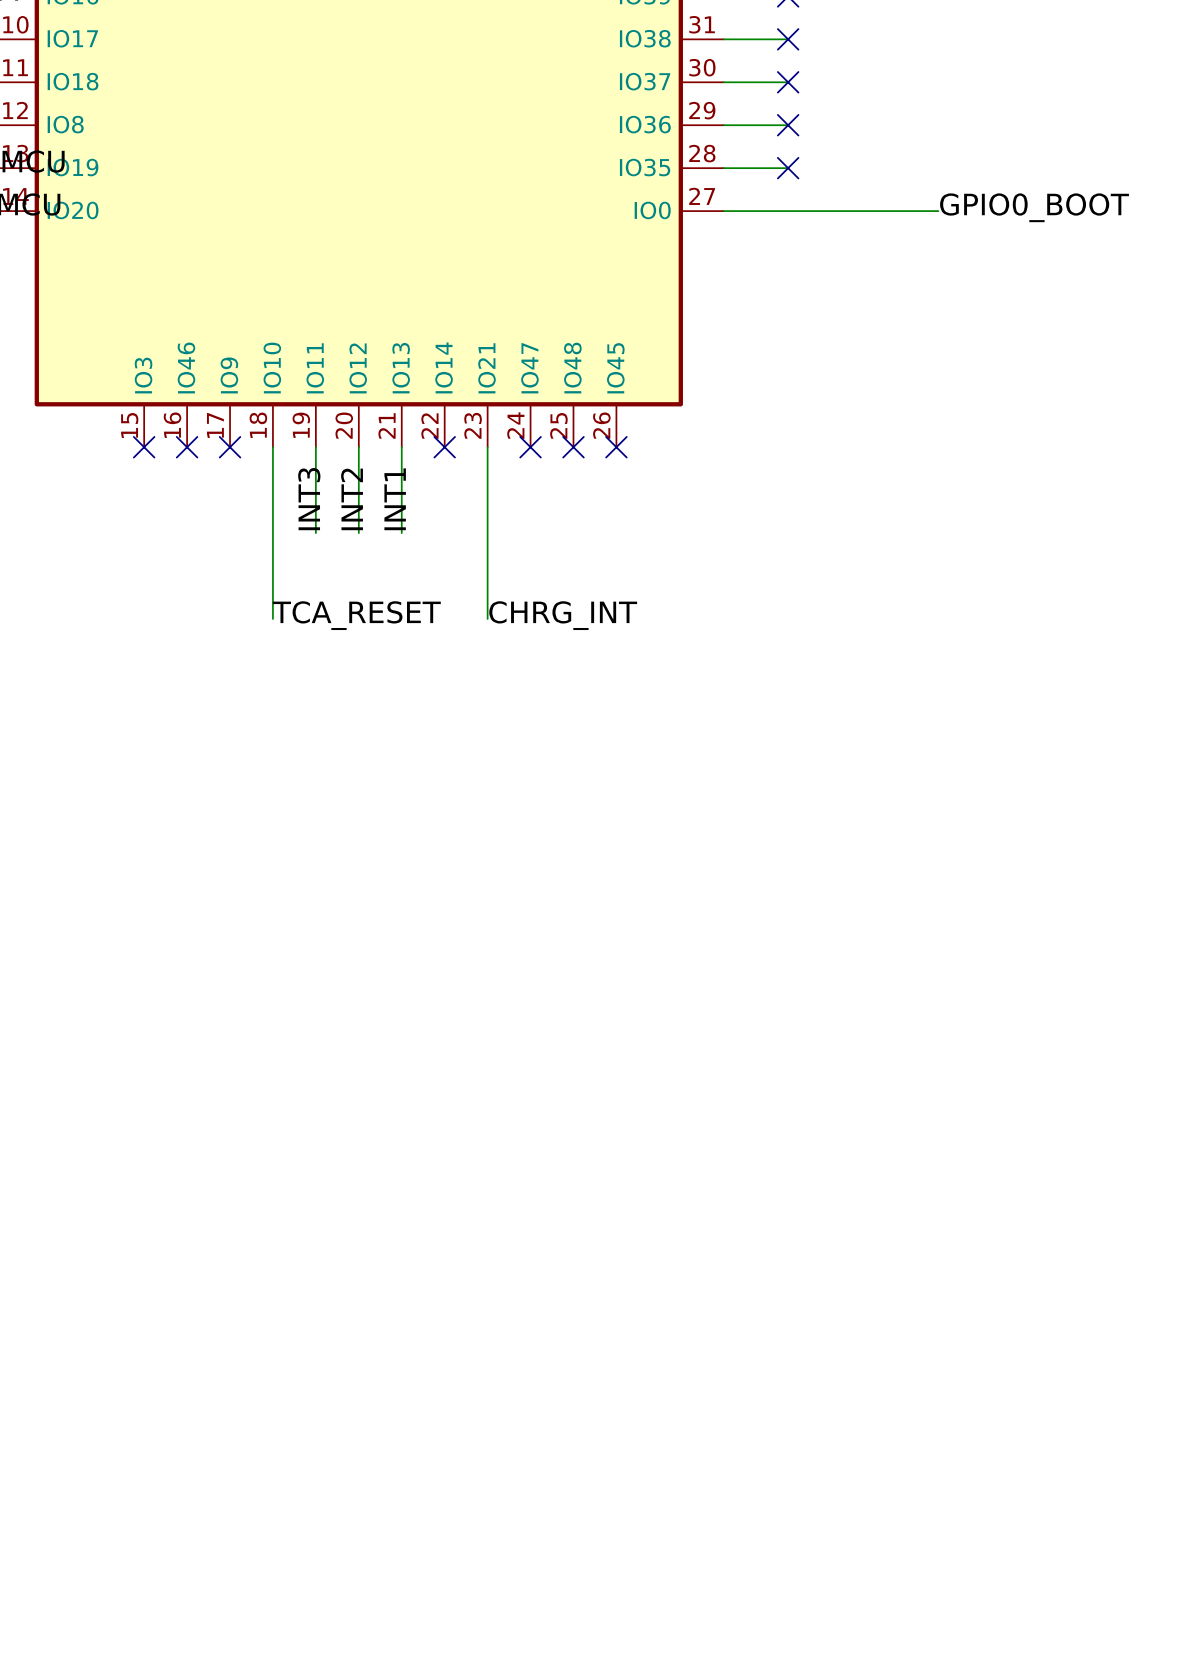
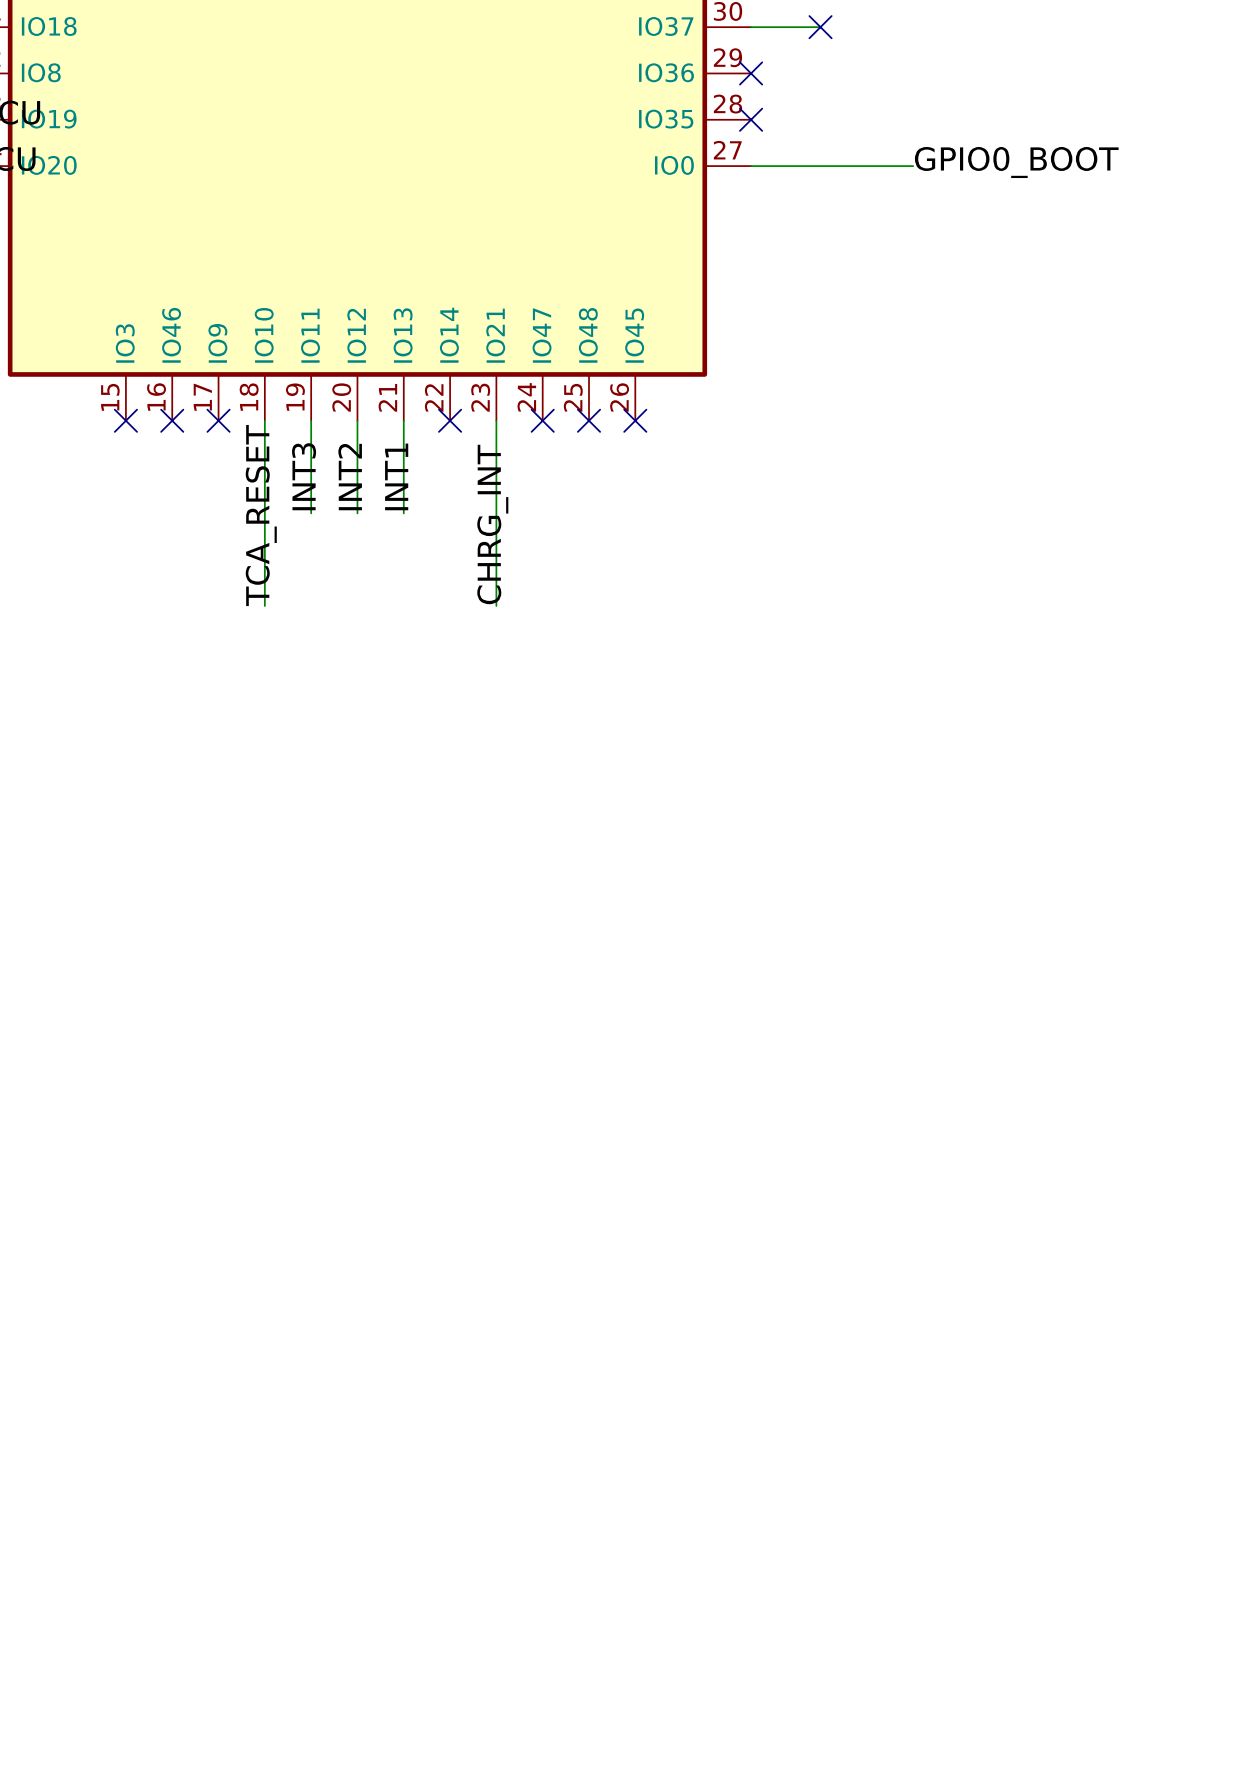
wire: (723, 125) (788, 125) -> none
no-connect mark: none -> (751, 73)
no-connect mark: (788, 125) -> none
wire: (723, 168) (788, 168) -> none
no-connect mark: none -> (751, 119)
no-connect mark: (788, 168) -> none
label position: GPIO0_BOOT (1034, 207) -> GPIO0_BOOT (1016, 162)
wire: (874, 211) (938, 211) -> none
label rotation: 0° (356, 615) -> 90° counterclockwise (261, 515)
label rotation: 0° (563, 615) -> 90° counterclockwise (492, 524)

